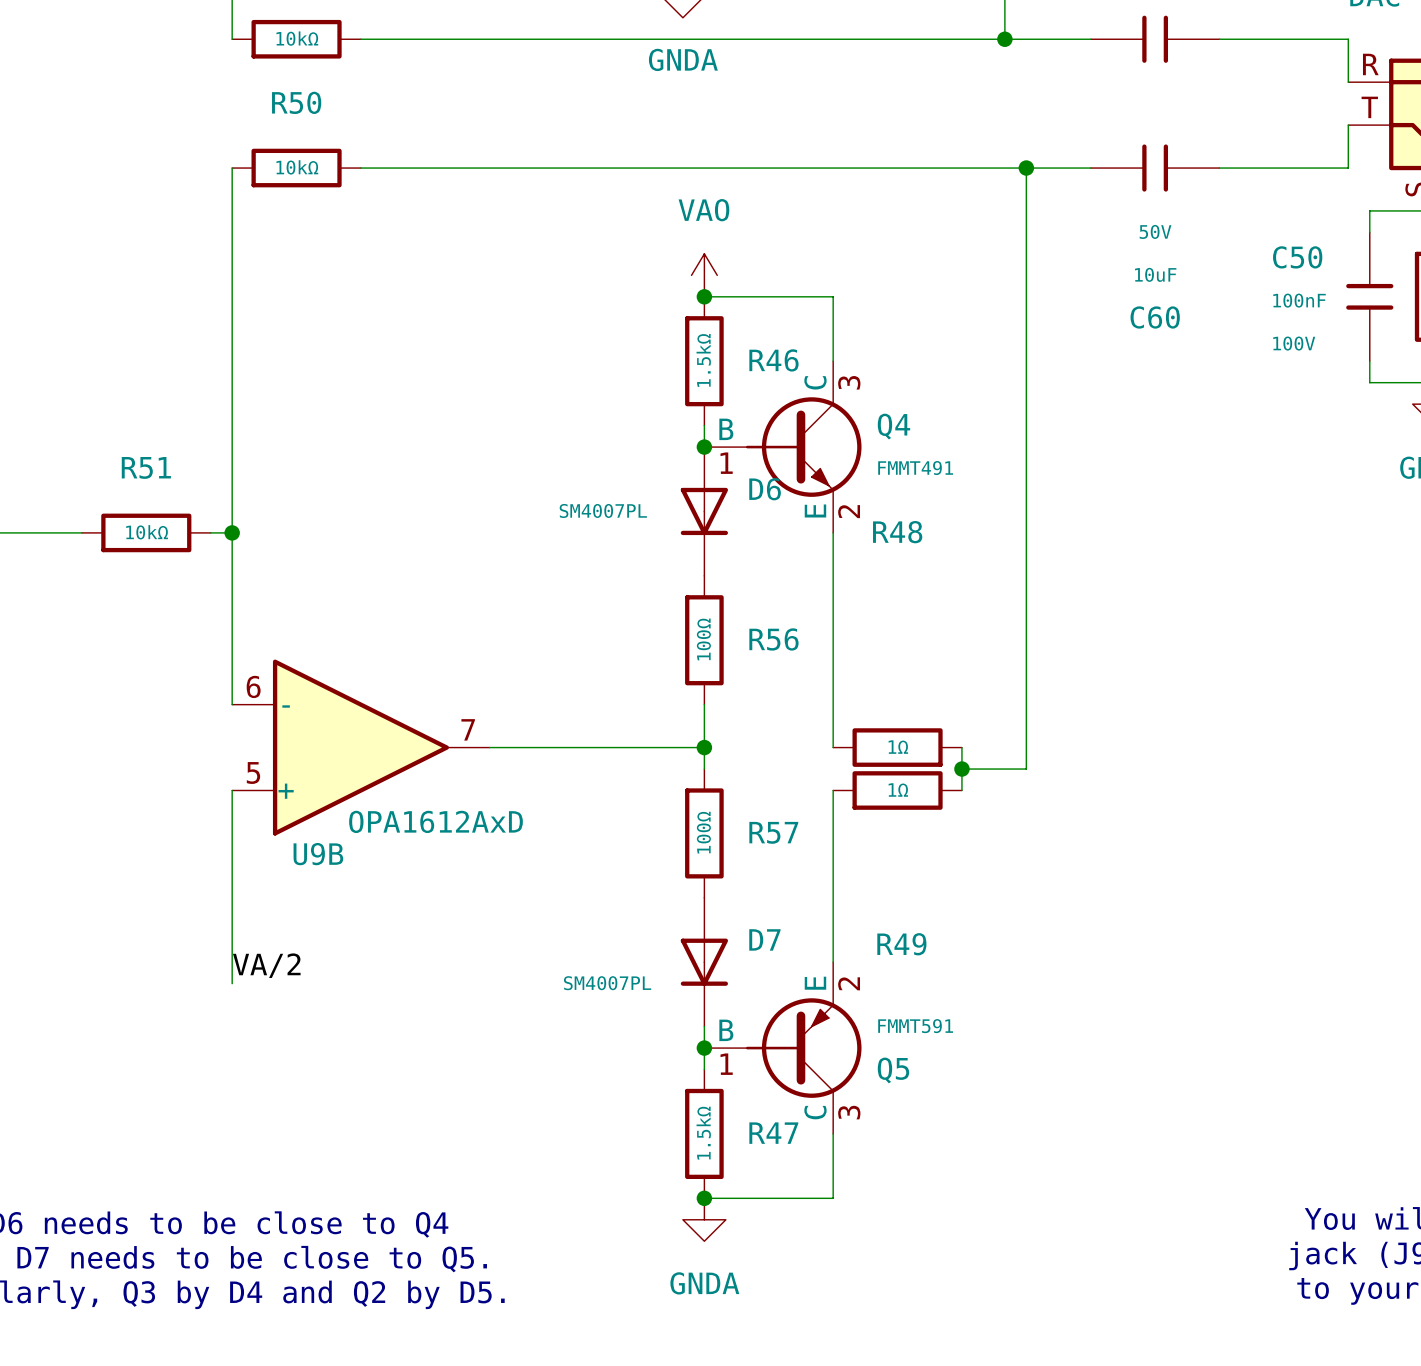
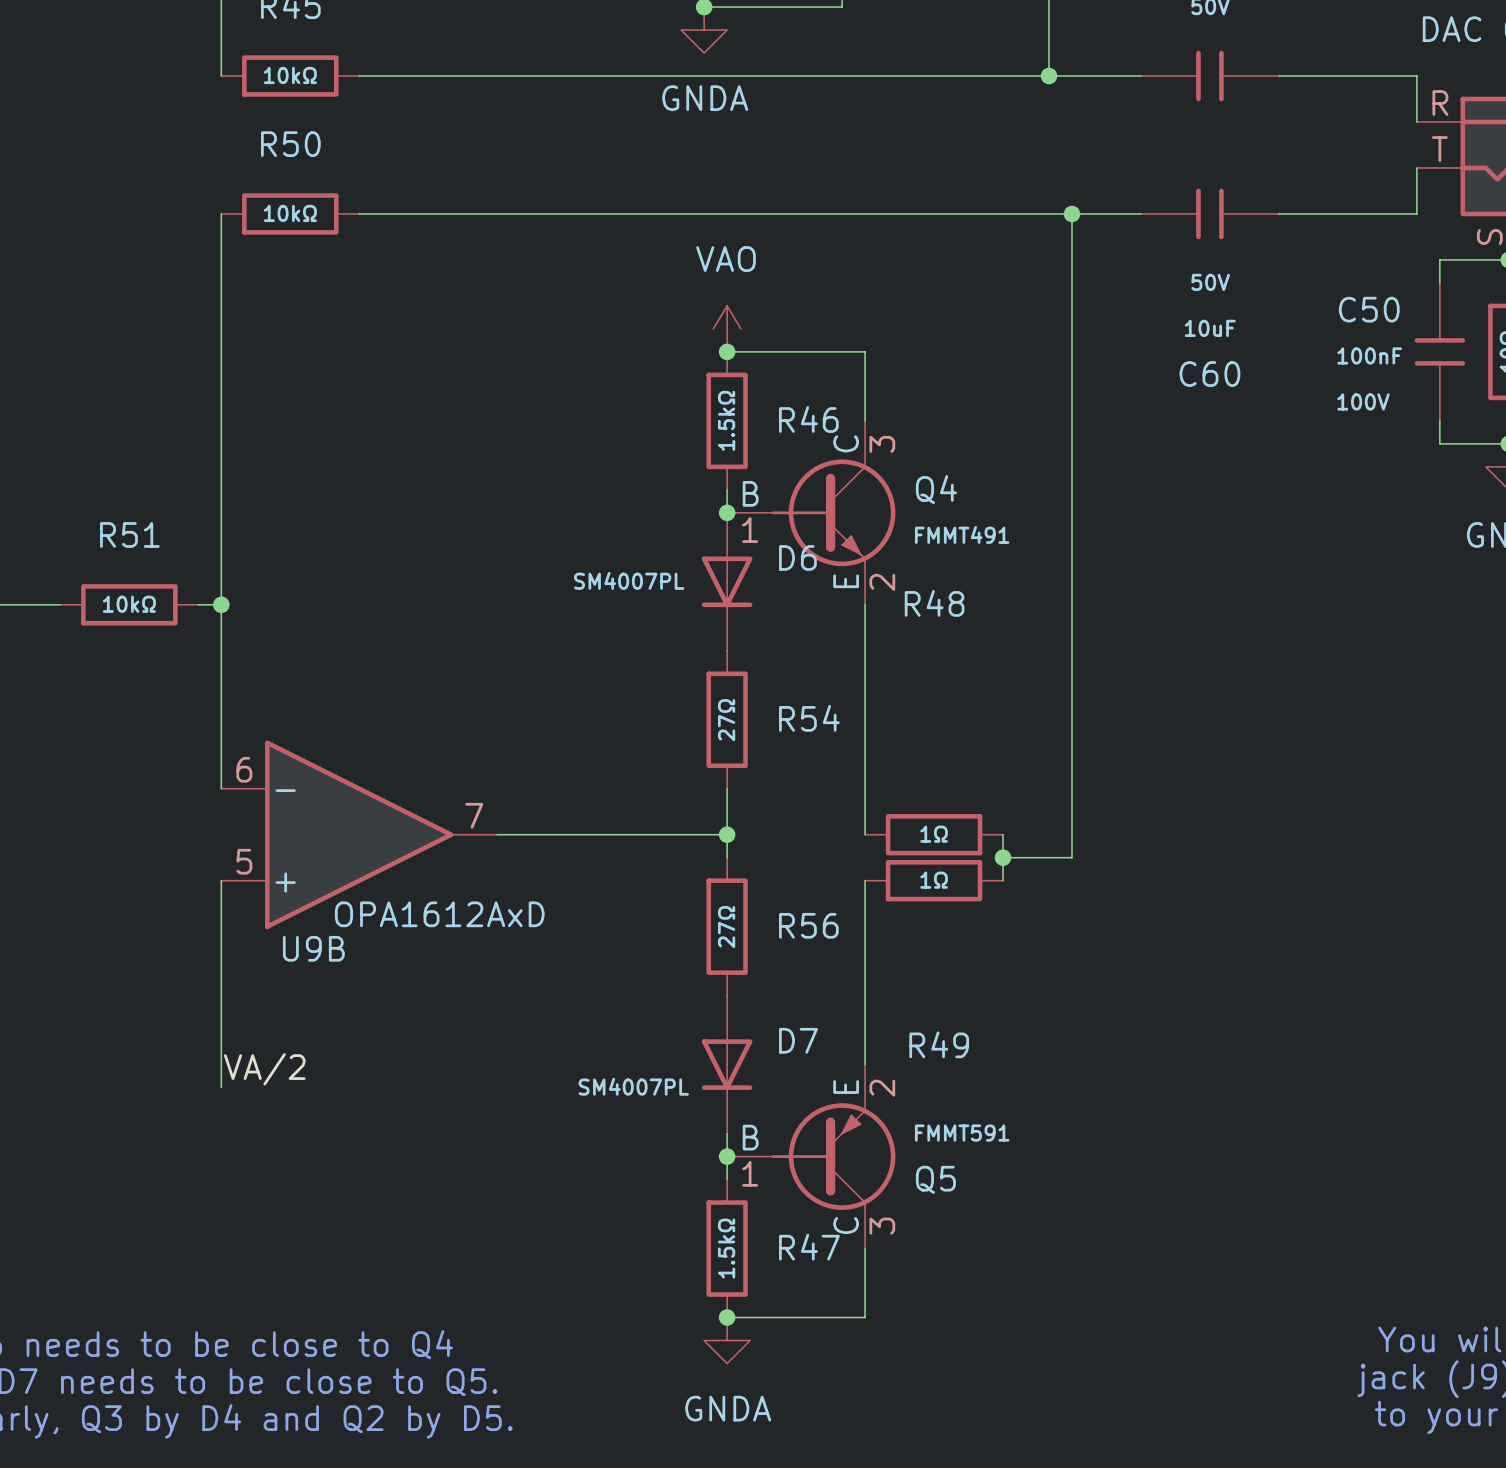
R56 value: 100Ω (703, 639) -> 27Ω (726, 720)
R56 name: R56 (773, 639) -> R54 (809, 718)
R57 value: 100Ω (703, 832) -> 27Ω (726, 927)
R57 name: R57 (773, 832) -> R56 (808, 925)

